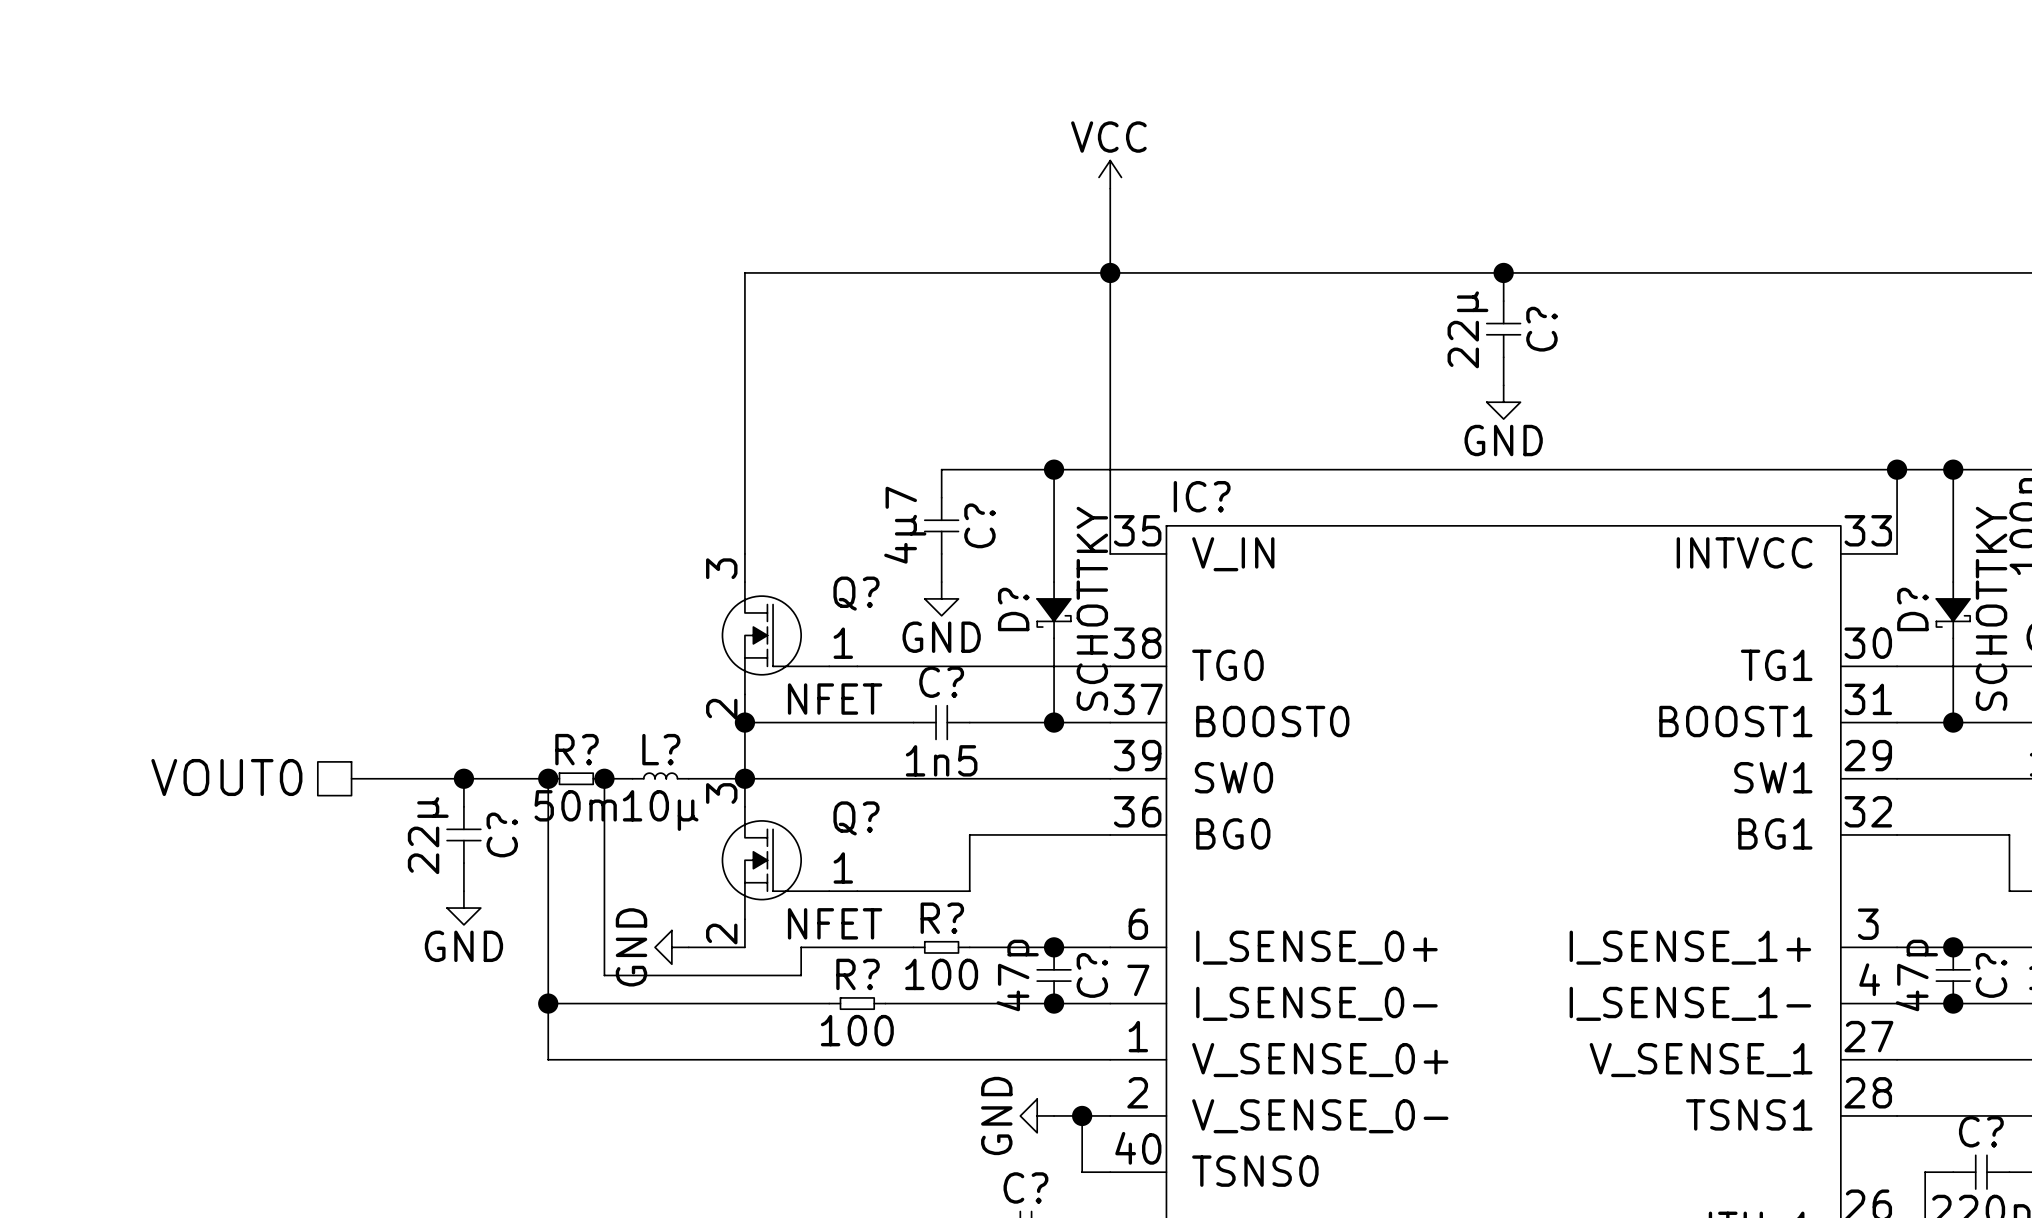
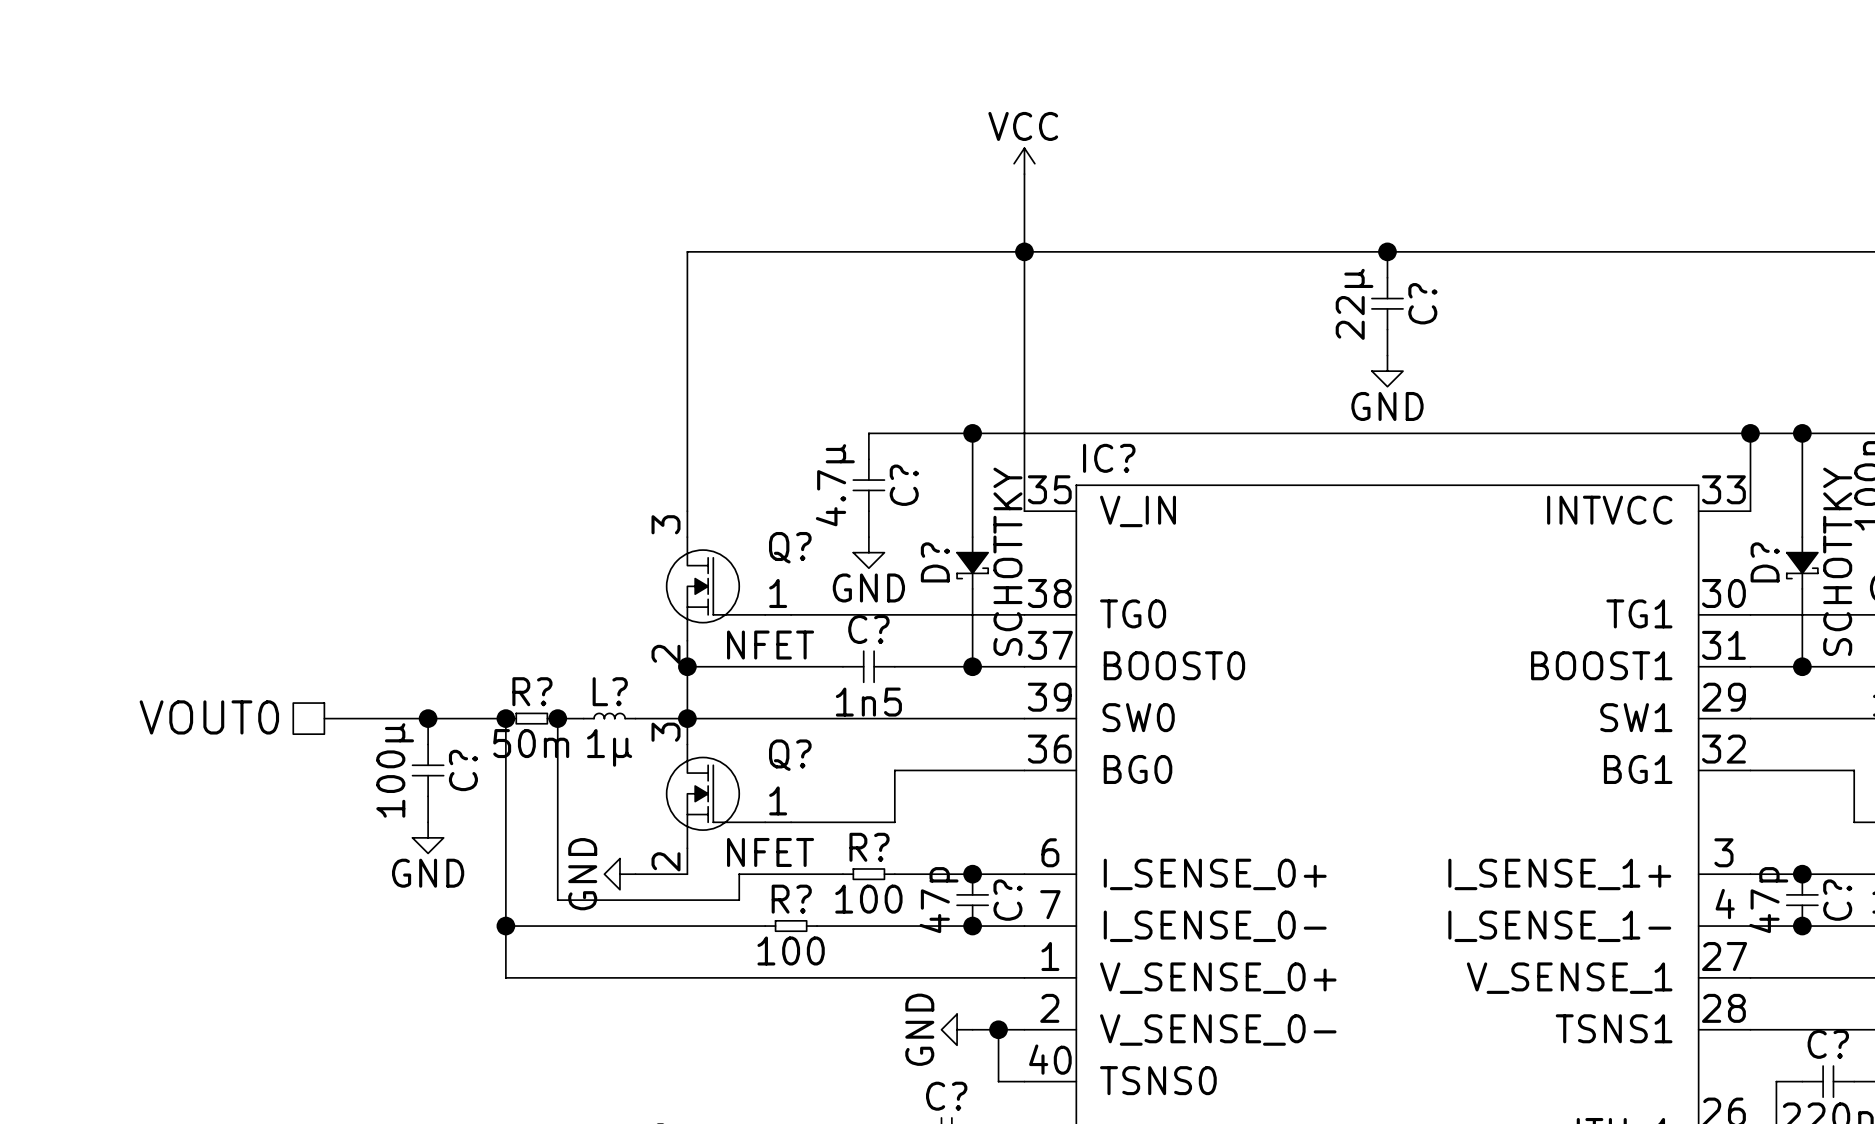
C? value: 4µ7 (905, 525) -> 4.7µ (835, 485)
L? value: 10µ (660, 810) -> 1µ (609, 747)
C? value: 22µ (428, 835) -> 100µ (395, 770)

